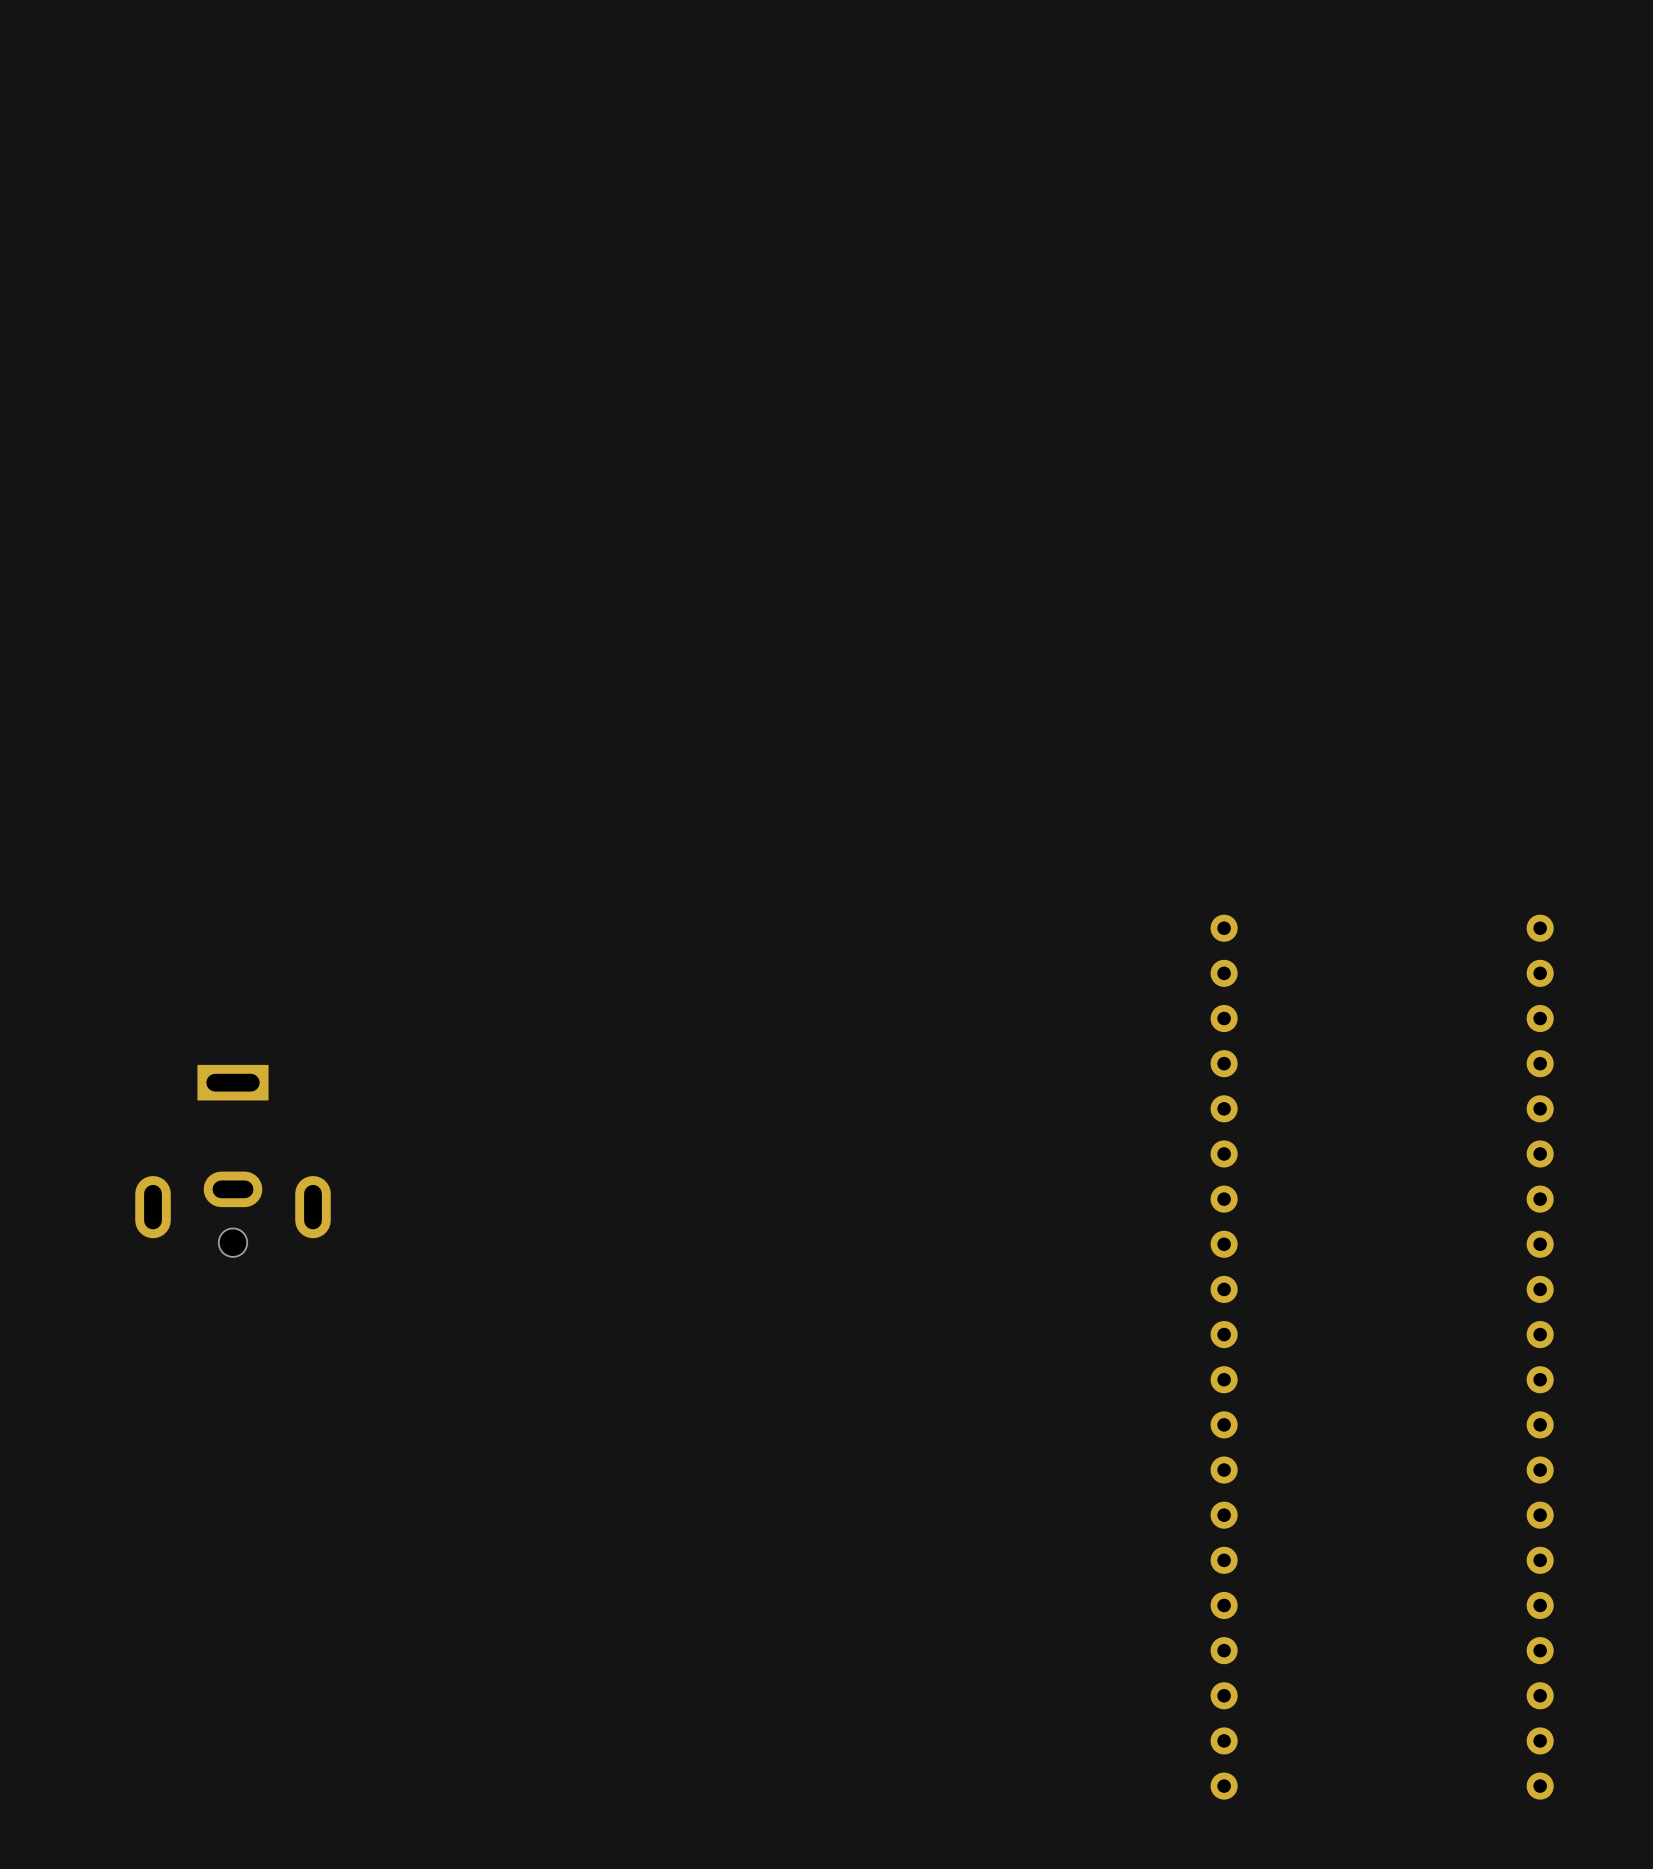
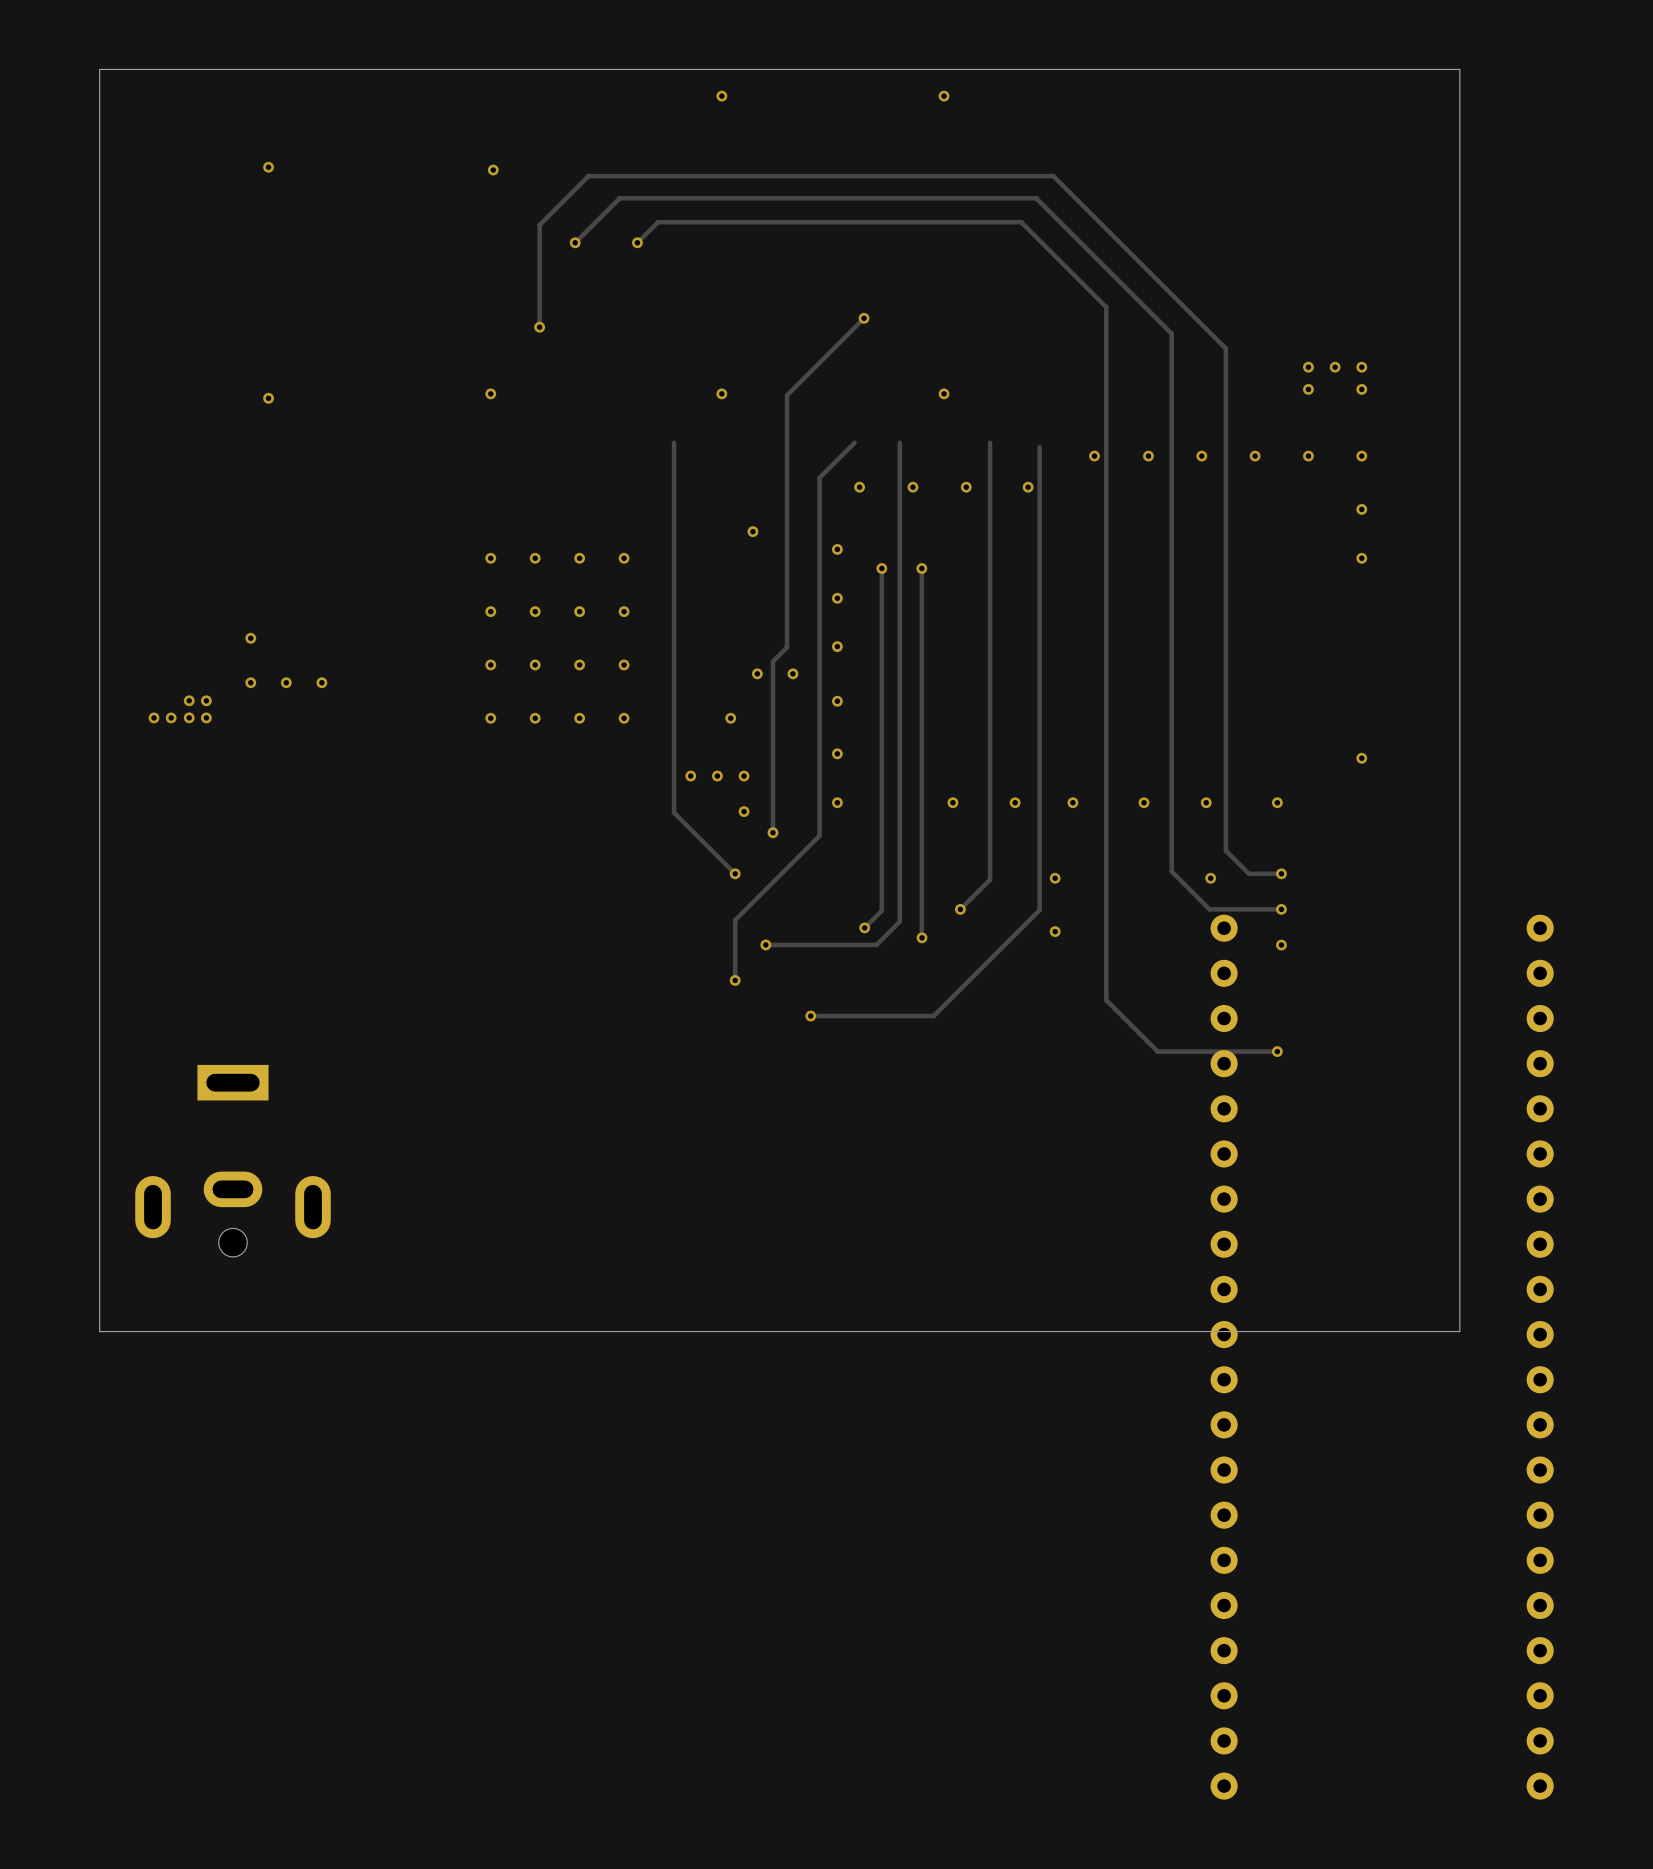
board edge: none -> (1459, 69) (1459, 1331) (99, 1331) (99, 69) (1459, 69)
via: none -> (721, 96)
via: none -> (944, 96)
via: none -> (268, 167)
via: none -> (493, 170)
track: none -> (575, 242) (619, 198) (1036, 198) (1171, 333) (1171, 871) (1209, 909) (1281, 909)
via: none -> (575, 242)
track: none -> (637, 242) (657, 222) (1021, 222) (1106, 307) (1106, 1000) (1157, 1051) (1277, 1051)
via: none -> (637, 242)
track: none -> (864, 318) (787, 395) (787, 647) (772, 661) (772, 832)
via: none -> (864, 318)
track: none -> (539, 327) (539, 224) (588, 176) (1053, 176) (1225, 348) (1225, 850) (1249, 873) (1281, 873)
via: none -> (539, 327)
via: none -> (1308, 367)
via: none -> (1335, 367)
via: none -> (1361, 367)
via: none -> (1308, 389)
via: none -> (1361, 389)
via: none -> (490, 393)
via: none -> (721, 393)
via: none -> (944, 393)
via: none -> (268, 398)
track: none -> (674, 442) (674, 812) (735, 873)
track: none -> (854, 442) (819, 477) (819, 835) (735, 920) (735, 980)
track: none -> (899, 442) (899, 921) (876, 944) (765, 944)
track: none -> (990, 442) (990, 879) (960, 909)
track: none -> (1039, 447) (1039, 910) (933, 1016) (810, 1016)
via: none -> (1094, 456)
via: none -> (1148, 456)
via: none -> (1201, 456)
via: none -> (1255, 456)
via: none -> (1308, 456)
via: none -> (1361, 456)
via: none -> (859, 487)
via: none -> (912, 487)
via: none -> (966, 487)
via: none -> (1028, 487)
via: none -> (1361, 509)
via: none -> (752, 531)
via: none -> (837, 549)
via: none -> (490, 558)
via: none -> (535, 558)
via: none -> (579, 558)
via: none -> (624, 558)
via: none -> (1361, 558)
track: none -> (881, 568) (881, 910) (864, 927)
via: none -> (881, 568)
track: none -> (921, 568) (921, 937)
via: none -> (921, 568)
via: none -> (837, 598)
via: none -> (490, 611)
via: none -> (535, 611)
via: none -> (579, 611)
via: none -> (624, 611)
via: none -> (250, 638)
via: none -> (837, 646)
via: none -> (490, 664)
via: none -> (535, 664)
via: none -> (579, 664)
via: none -> (624, 664)
via: none -> (757, 673)
via: none -> (792, 673)
via: none -> (250, 682)
via: none -> (286, 682)
via: none -> (321, 682)
via: none -> (189, 700)
via: none -> (206, 700)
via: none -> (837, 701)
via: none -> (154, 717)
via: none -> (171, 717)
via: none -> (189, 717)
via: none -> (206, 717)
via: none -> (490, 718)
via: none -> (535, 718)
via: none -> (579, 718)
via: none -> (624, 718)
via: none -> (730, 718)
via: none -> (837, 753)
via: none -> (1361, 758)
via: none -> (690, 776)
via: none -> (717, 776)
via: none -> (744, 776)
via: none -> (837, 802)
via: none -> (952, 802)
via: none -> (1015, 802)
via: none -> (1072, 802)
via: none -> (1144, 802)
via: none -> (1206, 802)
via: none -> (1277, 802)
via: none -> (744, 811)
via: none -> (772, 832)
via: none -> (735, 873)
via: none -> (1281, 873)
via: none -> (1055, 878)
via: none -> (1210, 878)
via: none -> (960, 909)
via: none -> (1281, 909)
via: none -> (864, 927)
via: none -> (1055, 931)
via: none -> (922, 937)
via: none -> (765, 944)
via: none -> (1281, 945)
via: none -> (735, 980)
via: none -> (810, 1016)
via: none -> (1277, 1051)

